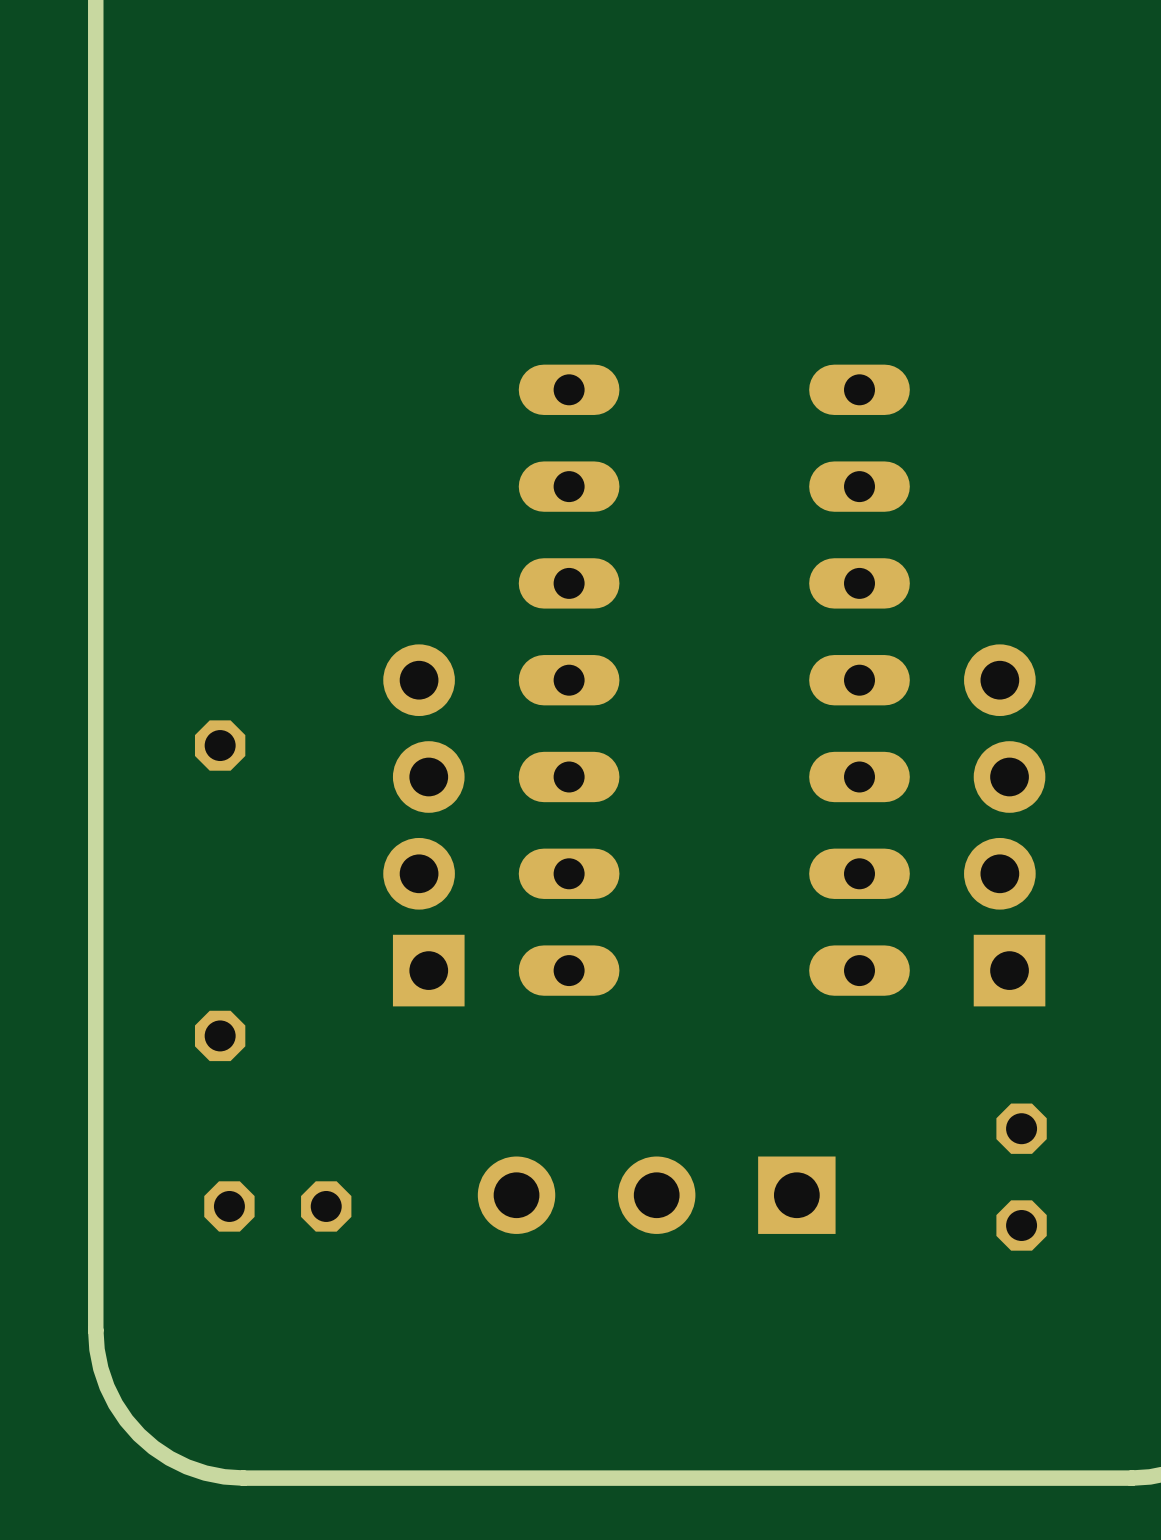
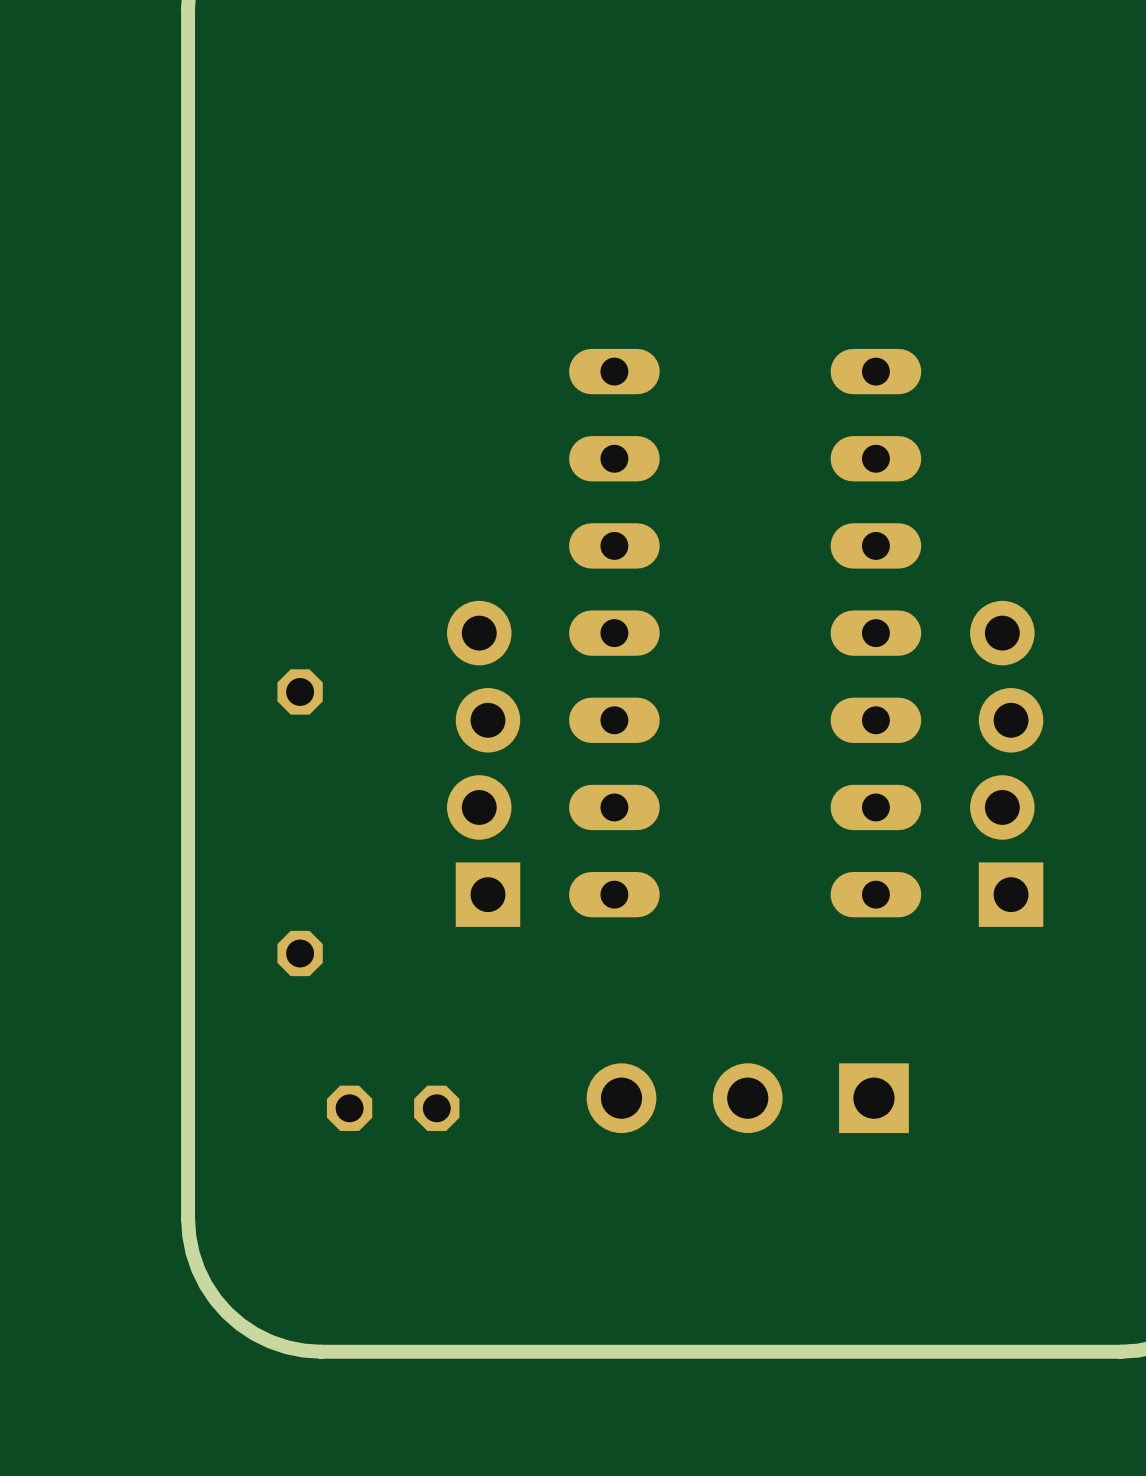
part: (1021, 1177) -> none
part position: (656, 1195) -> (747, 1098)
part position: (277, 1206) -> (393, 1108)

